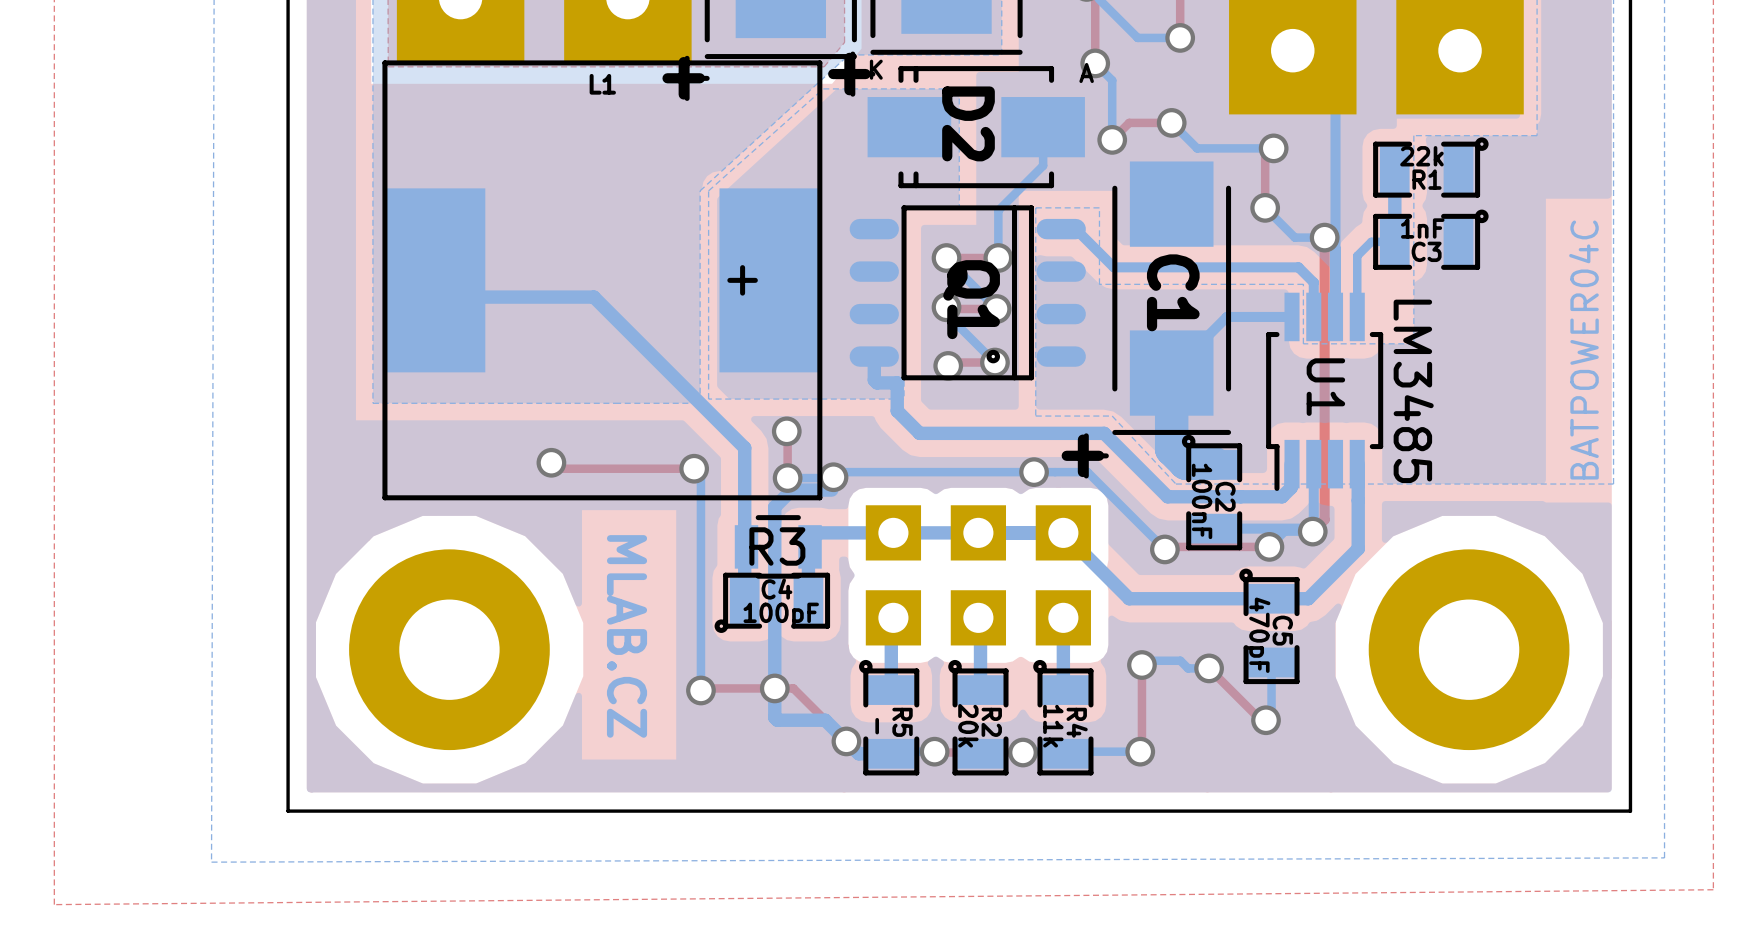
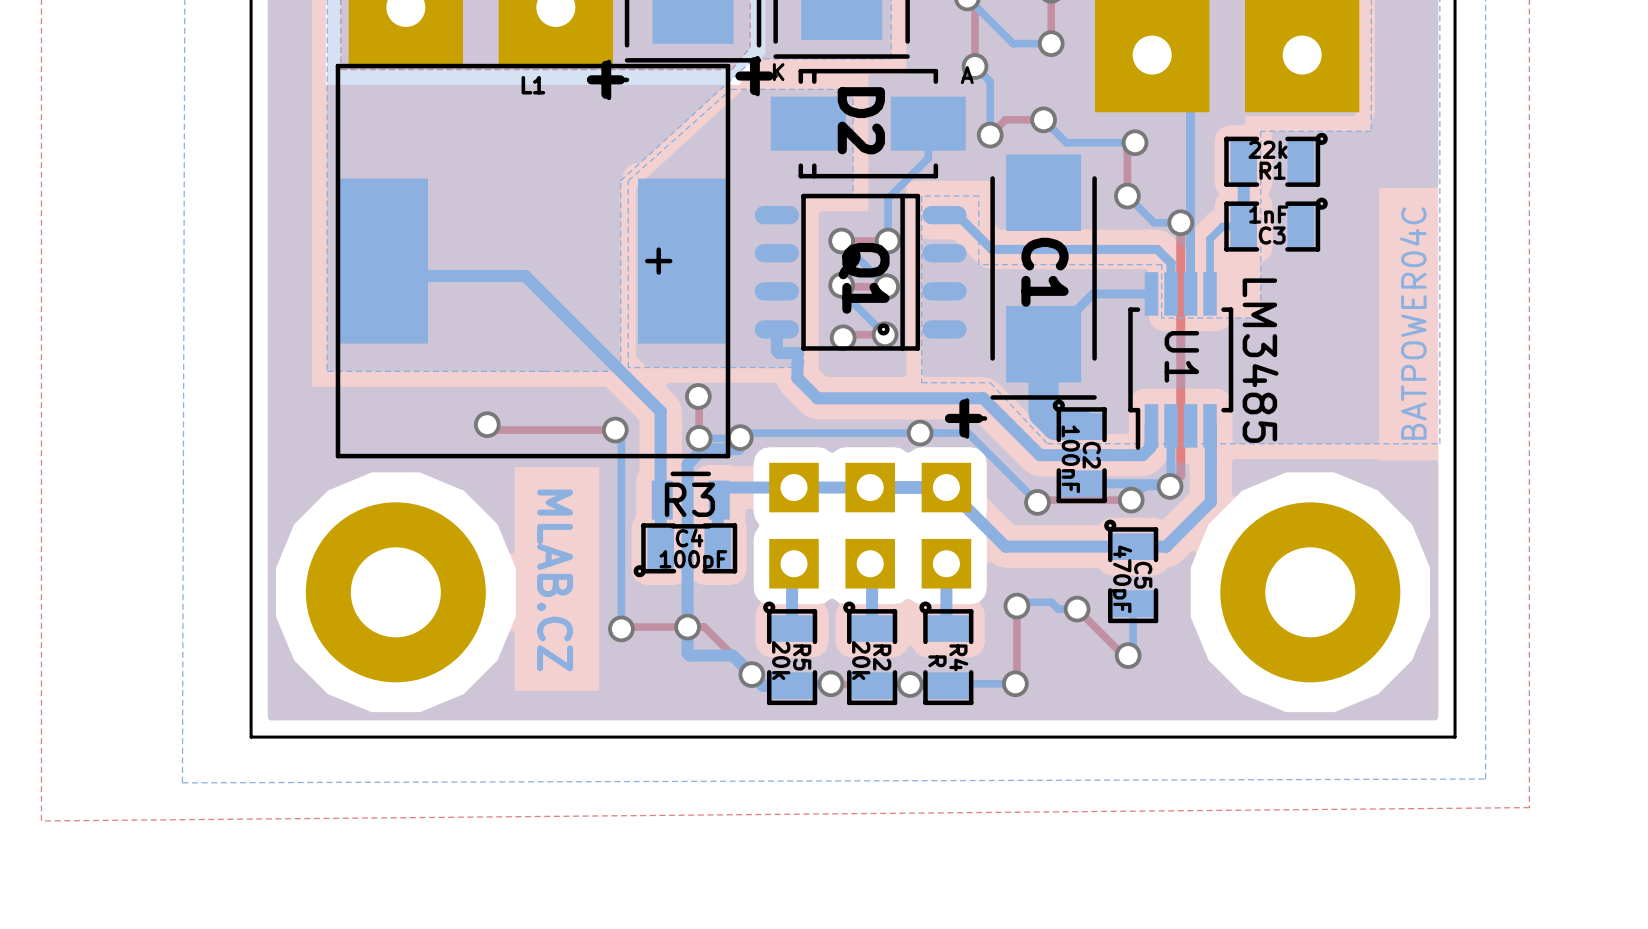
R5 value: - (877, 726) -> 20k (781, 660)
R4 value: 11k (1053, 726) -> R (937, 661)

